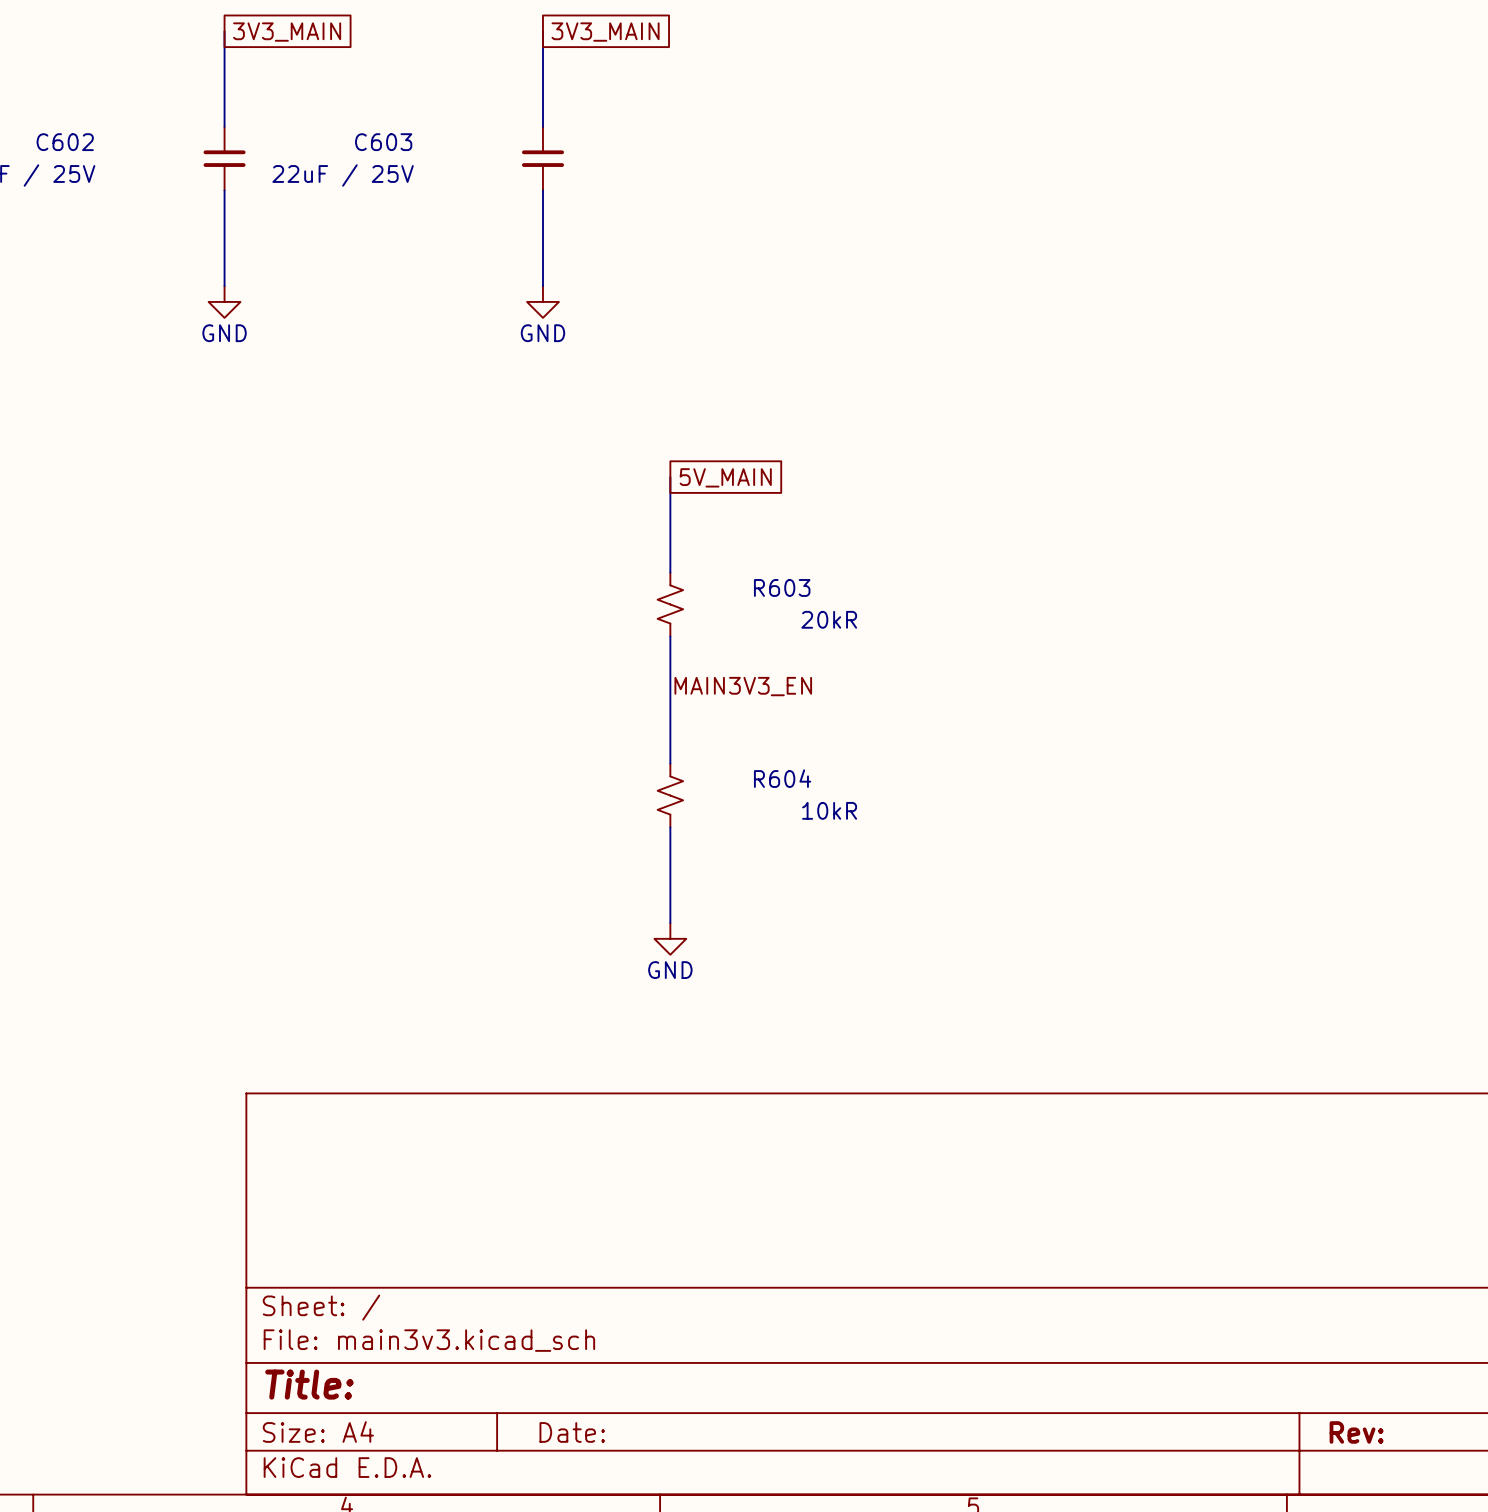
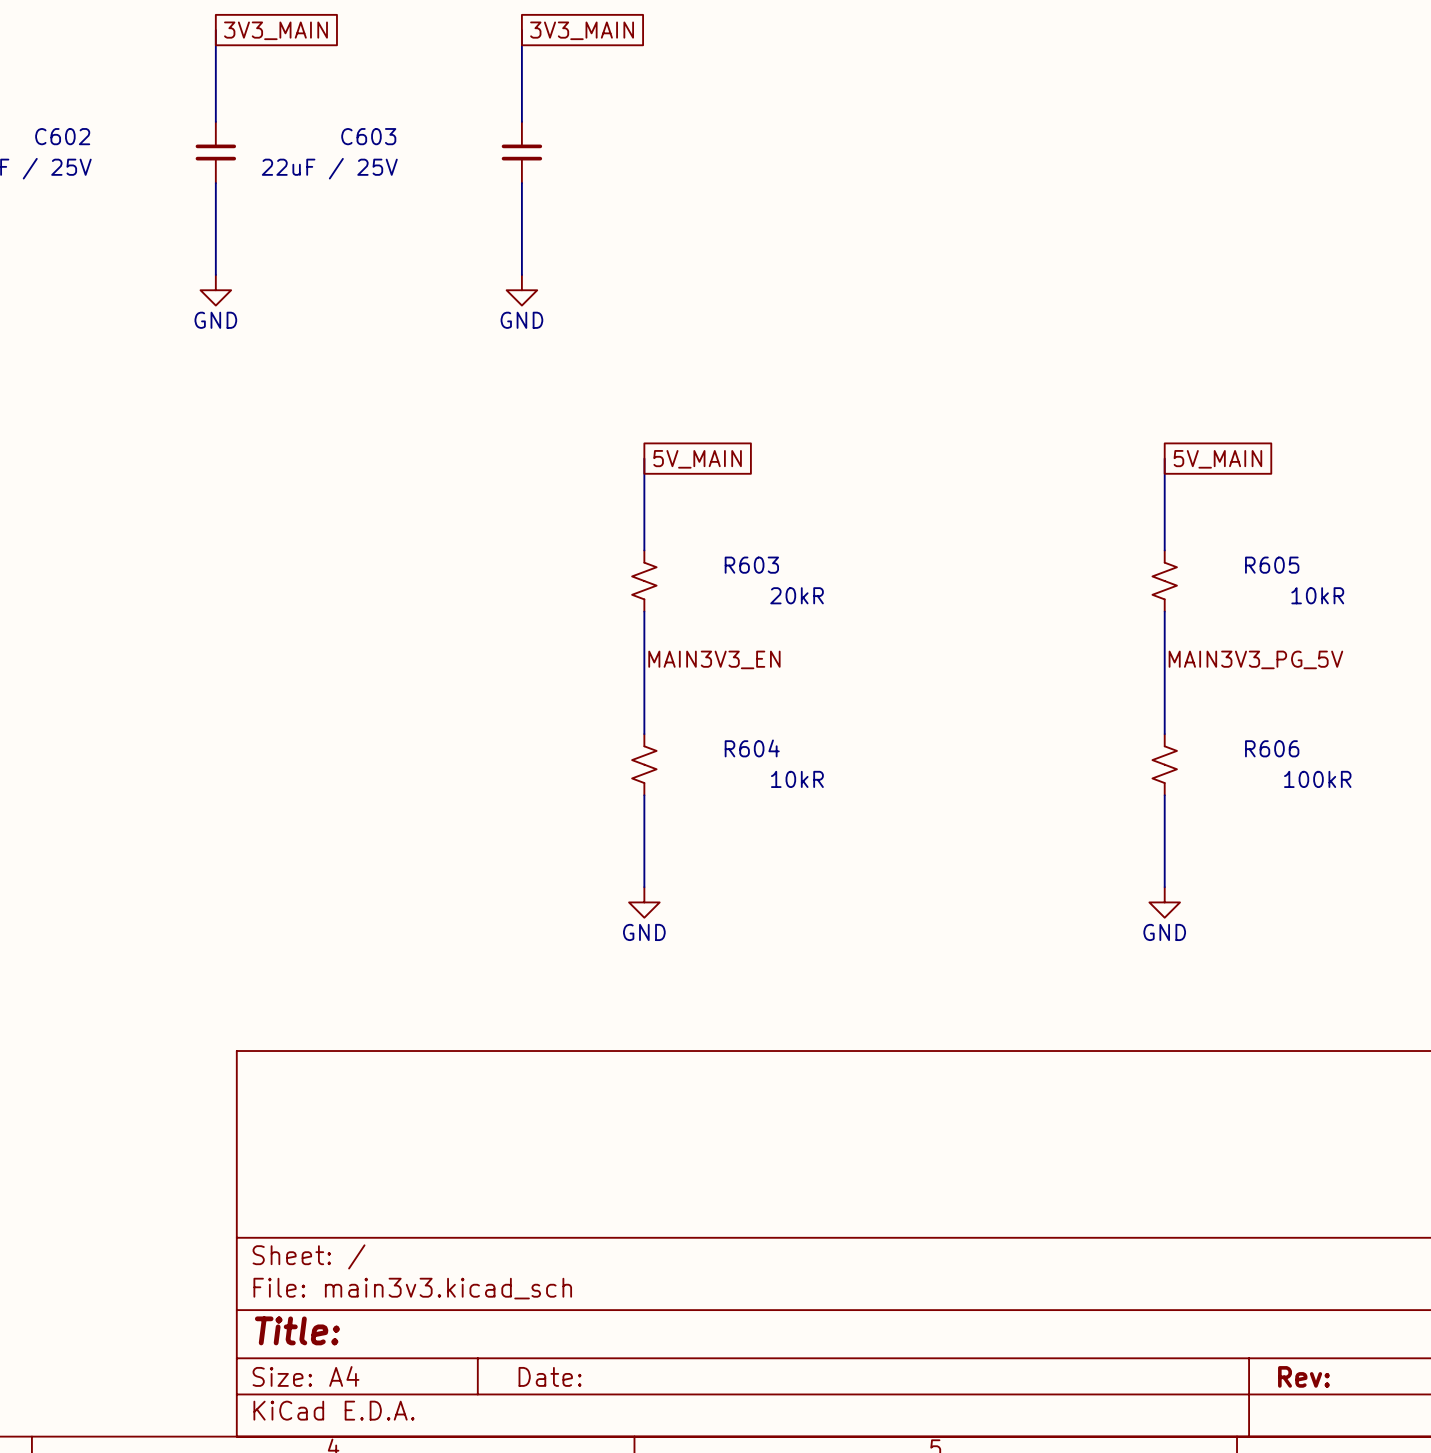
wire: none -> (1164, 458) (1164, 550)
global label: none -> 5V_MAIN (1217, 459)
R605: none -> 10kR (1164, 581)
wire: none -> (1164, 611) (1164, 734)
label: none -> MAIN3V3_PG_5V (1255, 659)
R606: none -> 100kR (1164, 764)
wire: none -> (1164, 795) (1164, 887)
power symbol: none -> GND (1164, 902)

